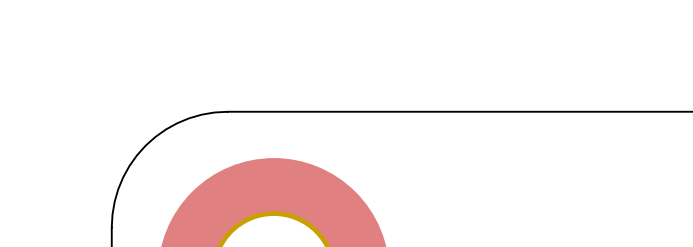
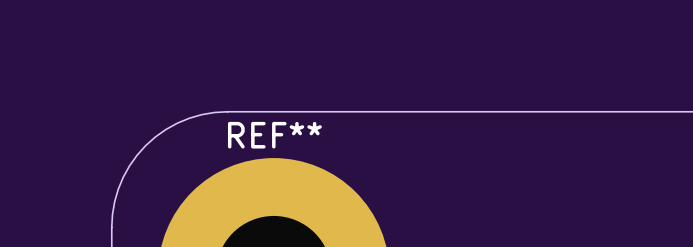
REF** name: none -> REF** (274, 135)

